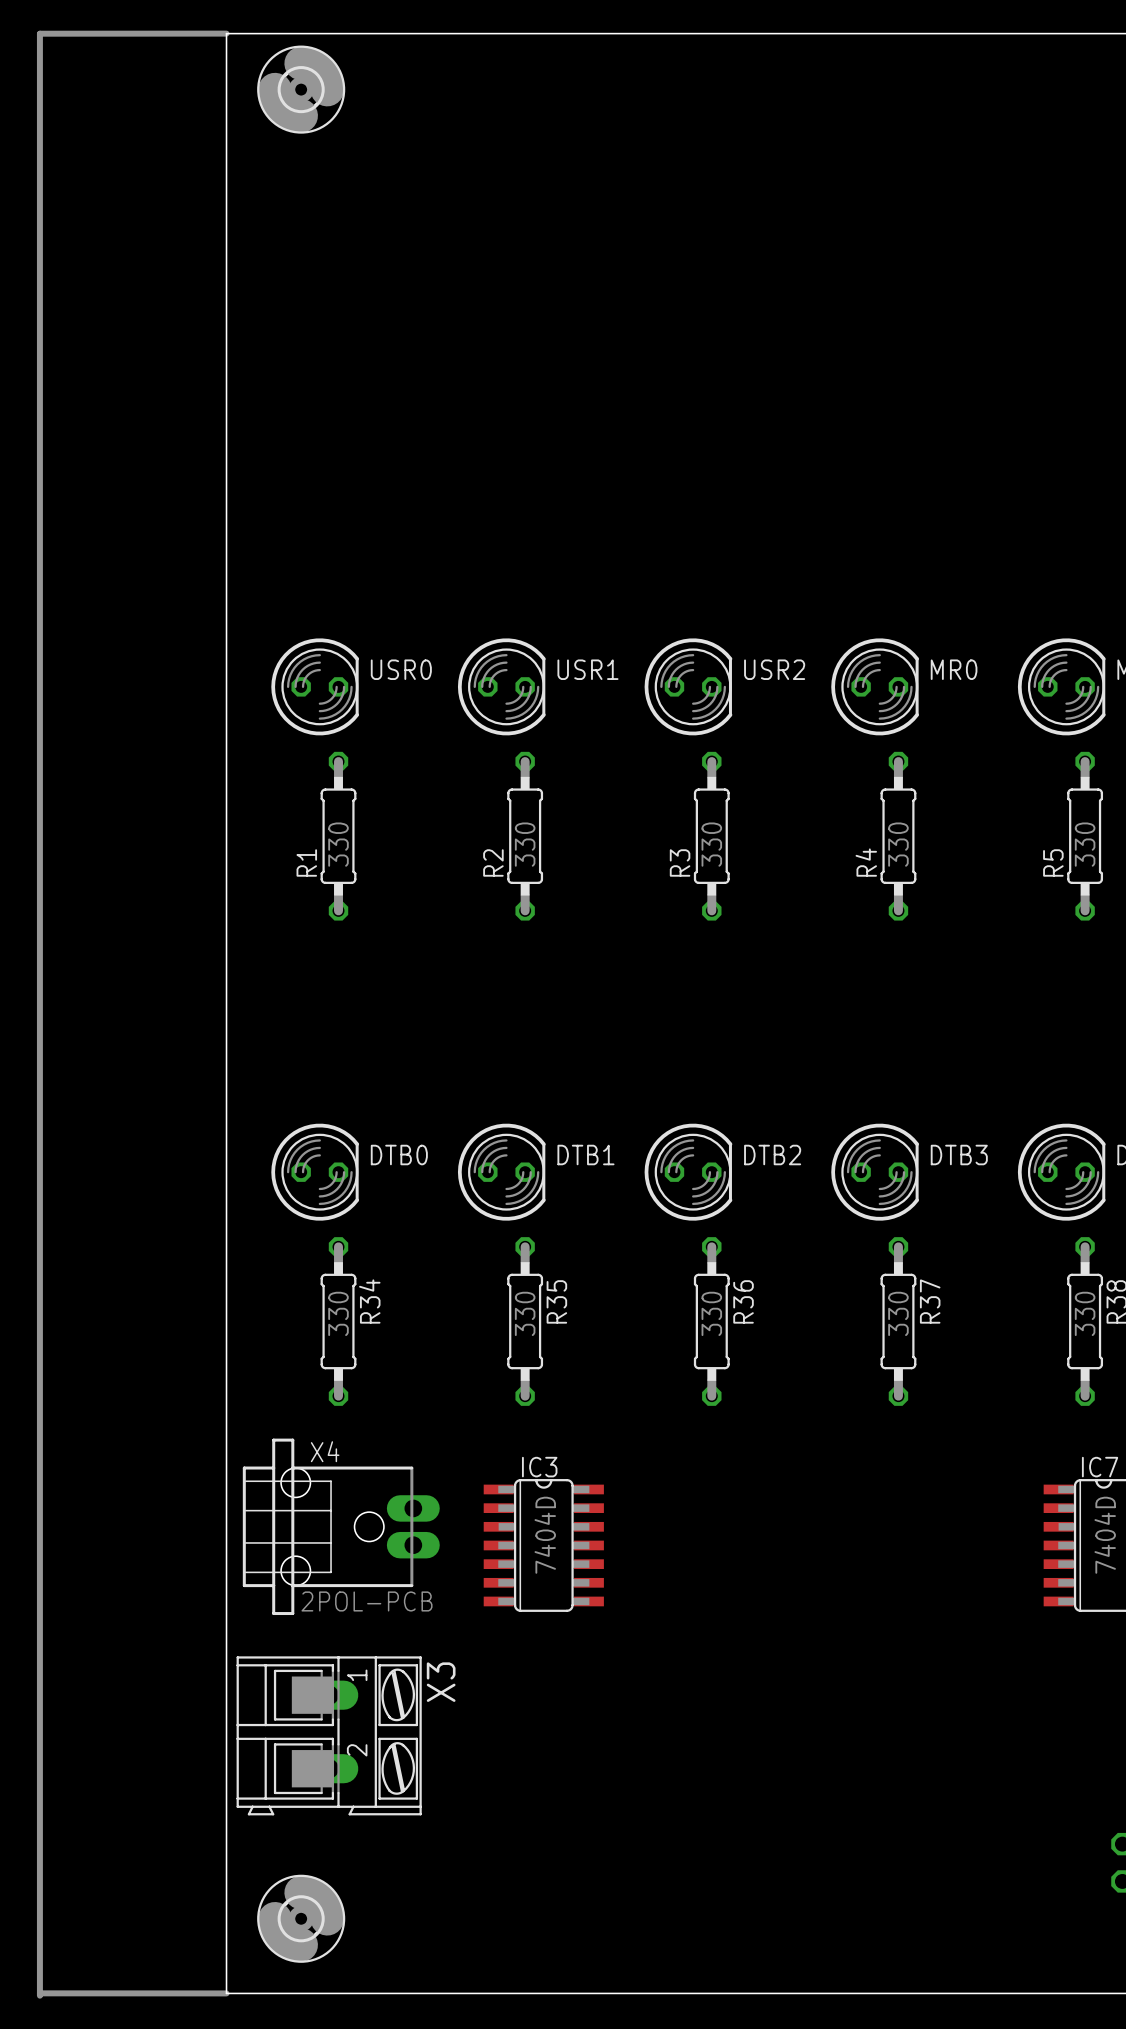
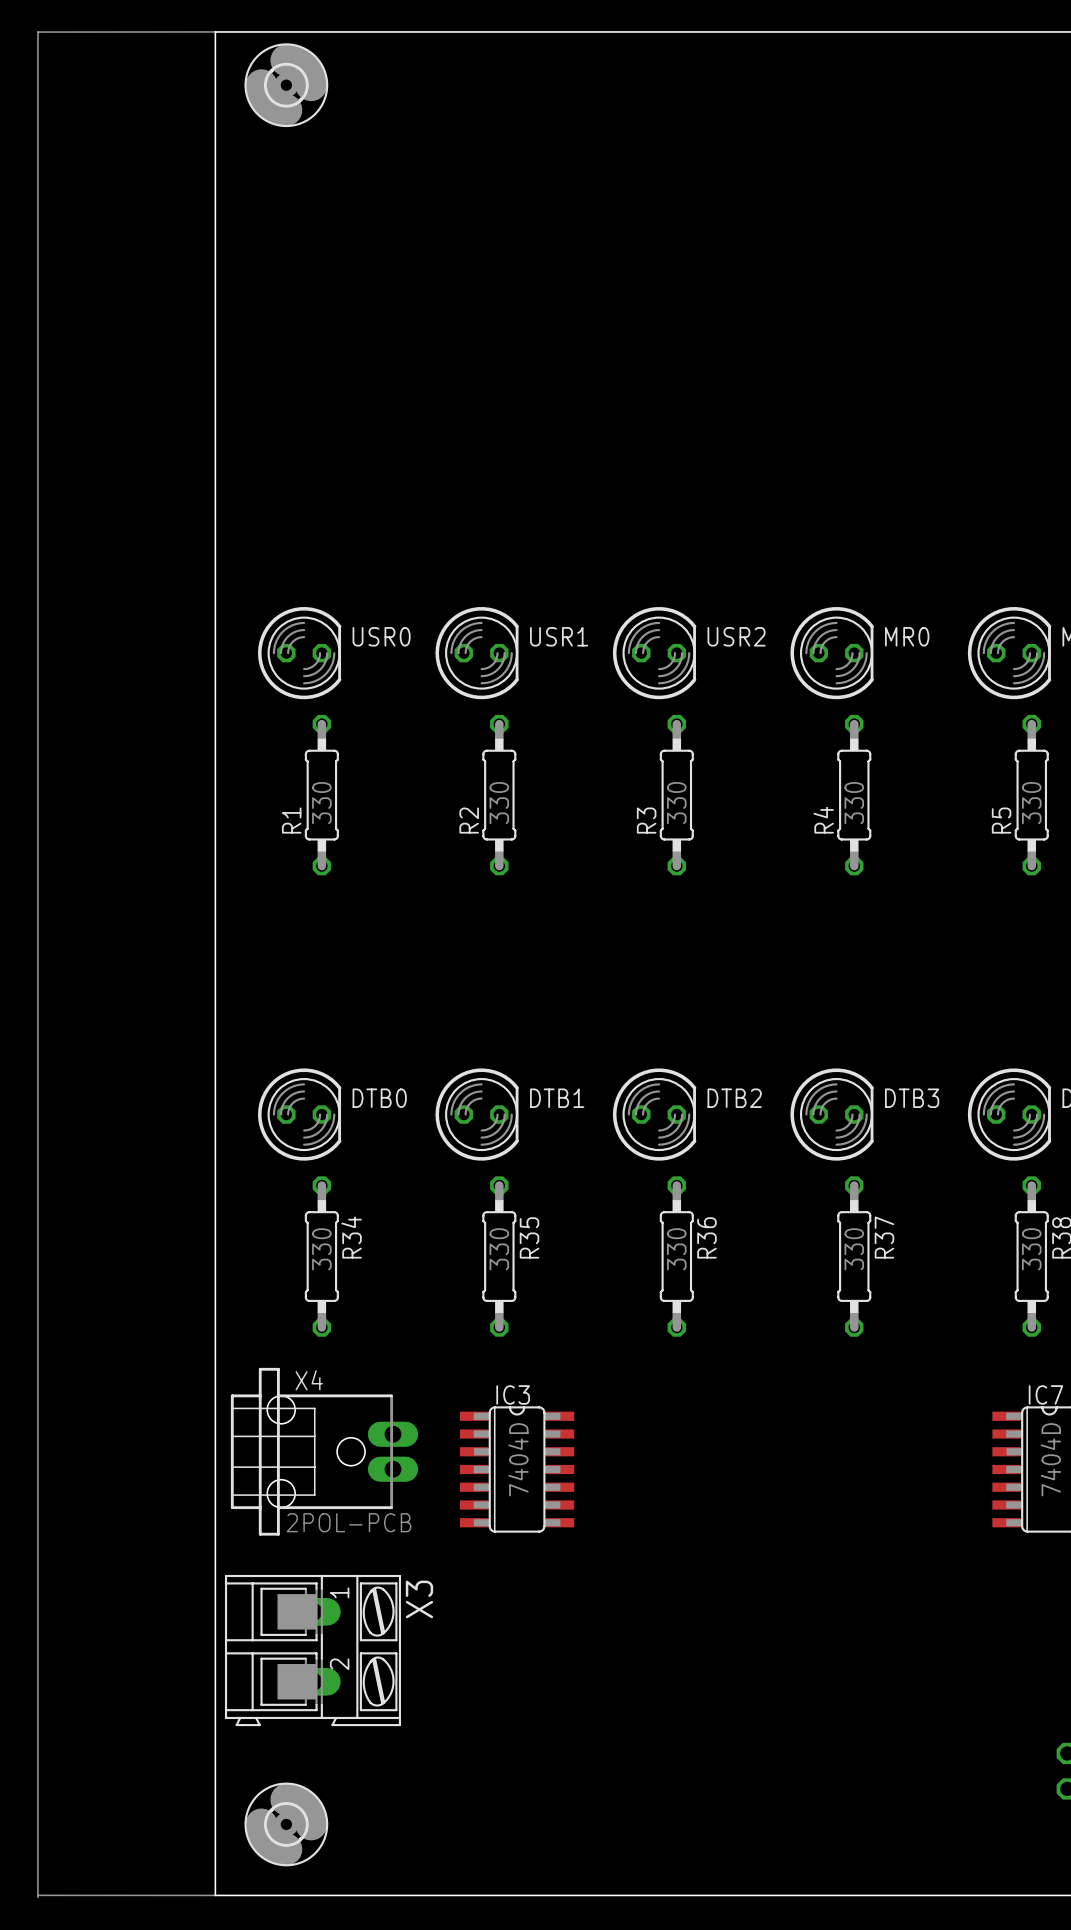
line width: thick (226, 33) (39, 33) (39, 1995) -> thin (215, 31) (37, 32) (37, 1897)
line width: thick (39, 1993) (226, 1993) -> thin (37, 1895) (215, 1895)

